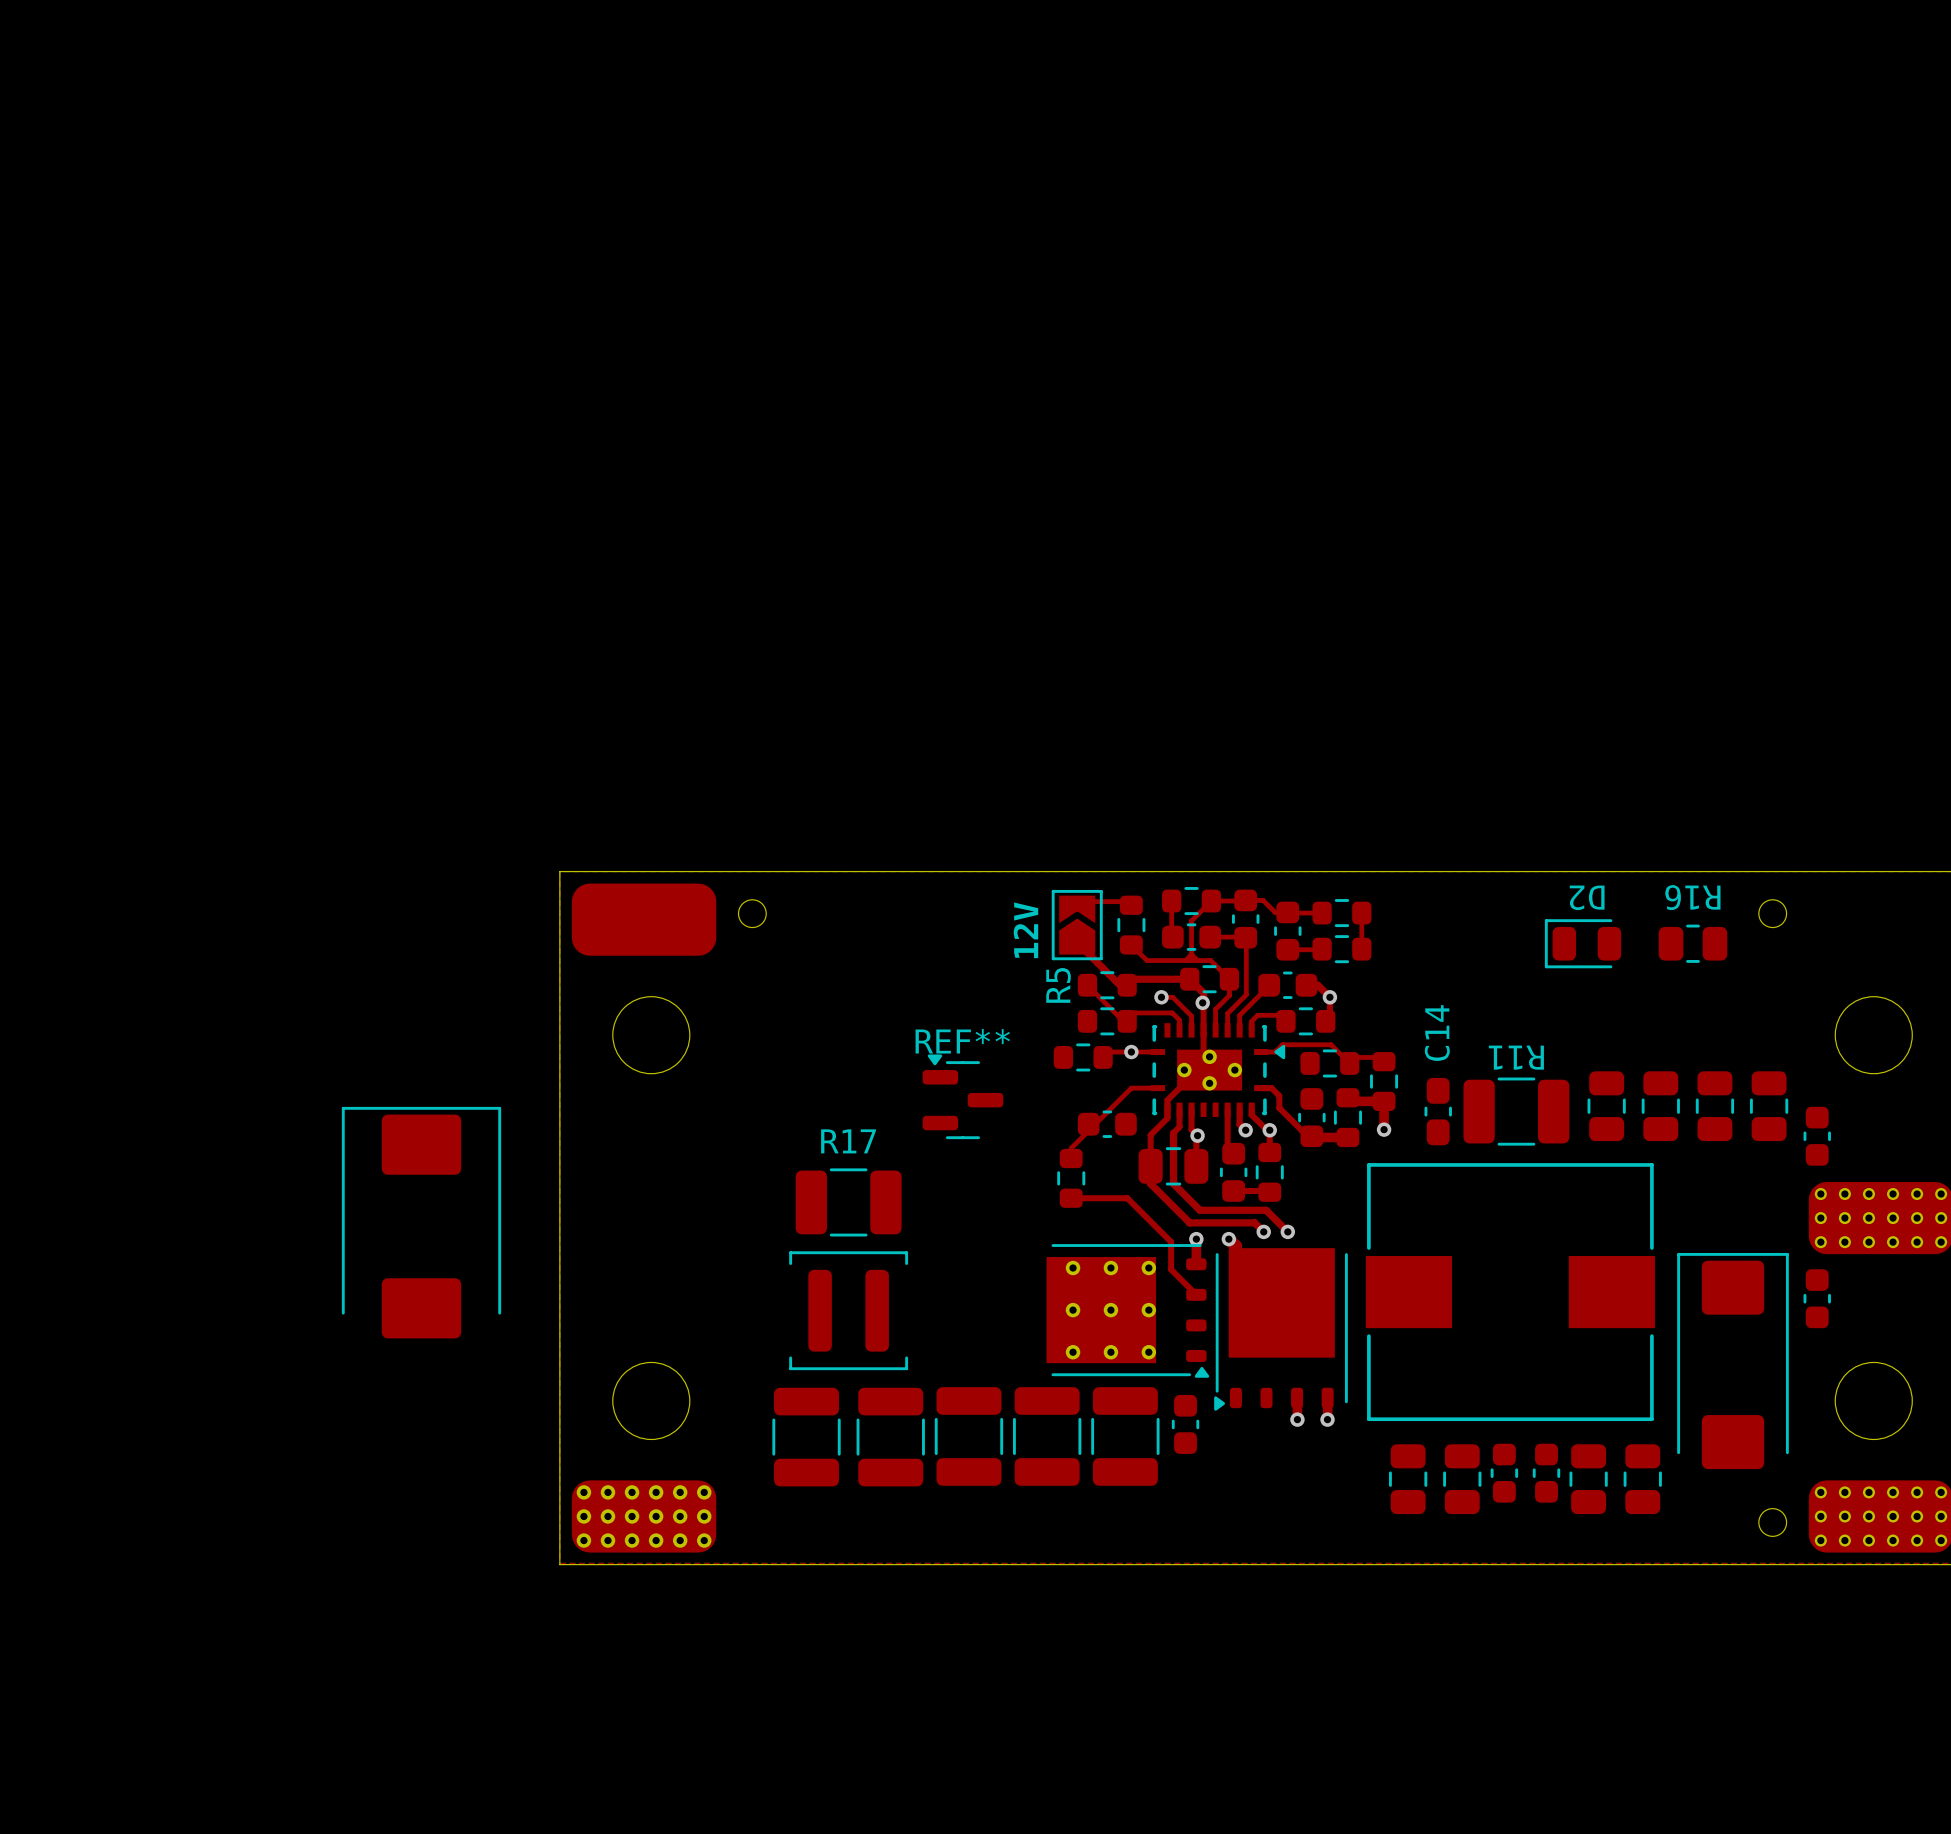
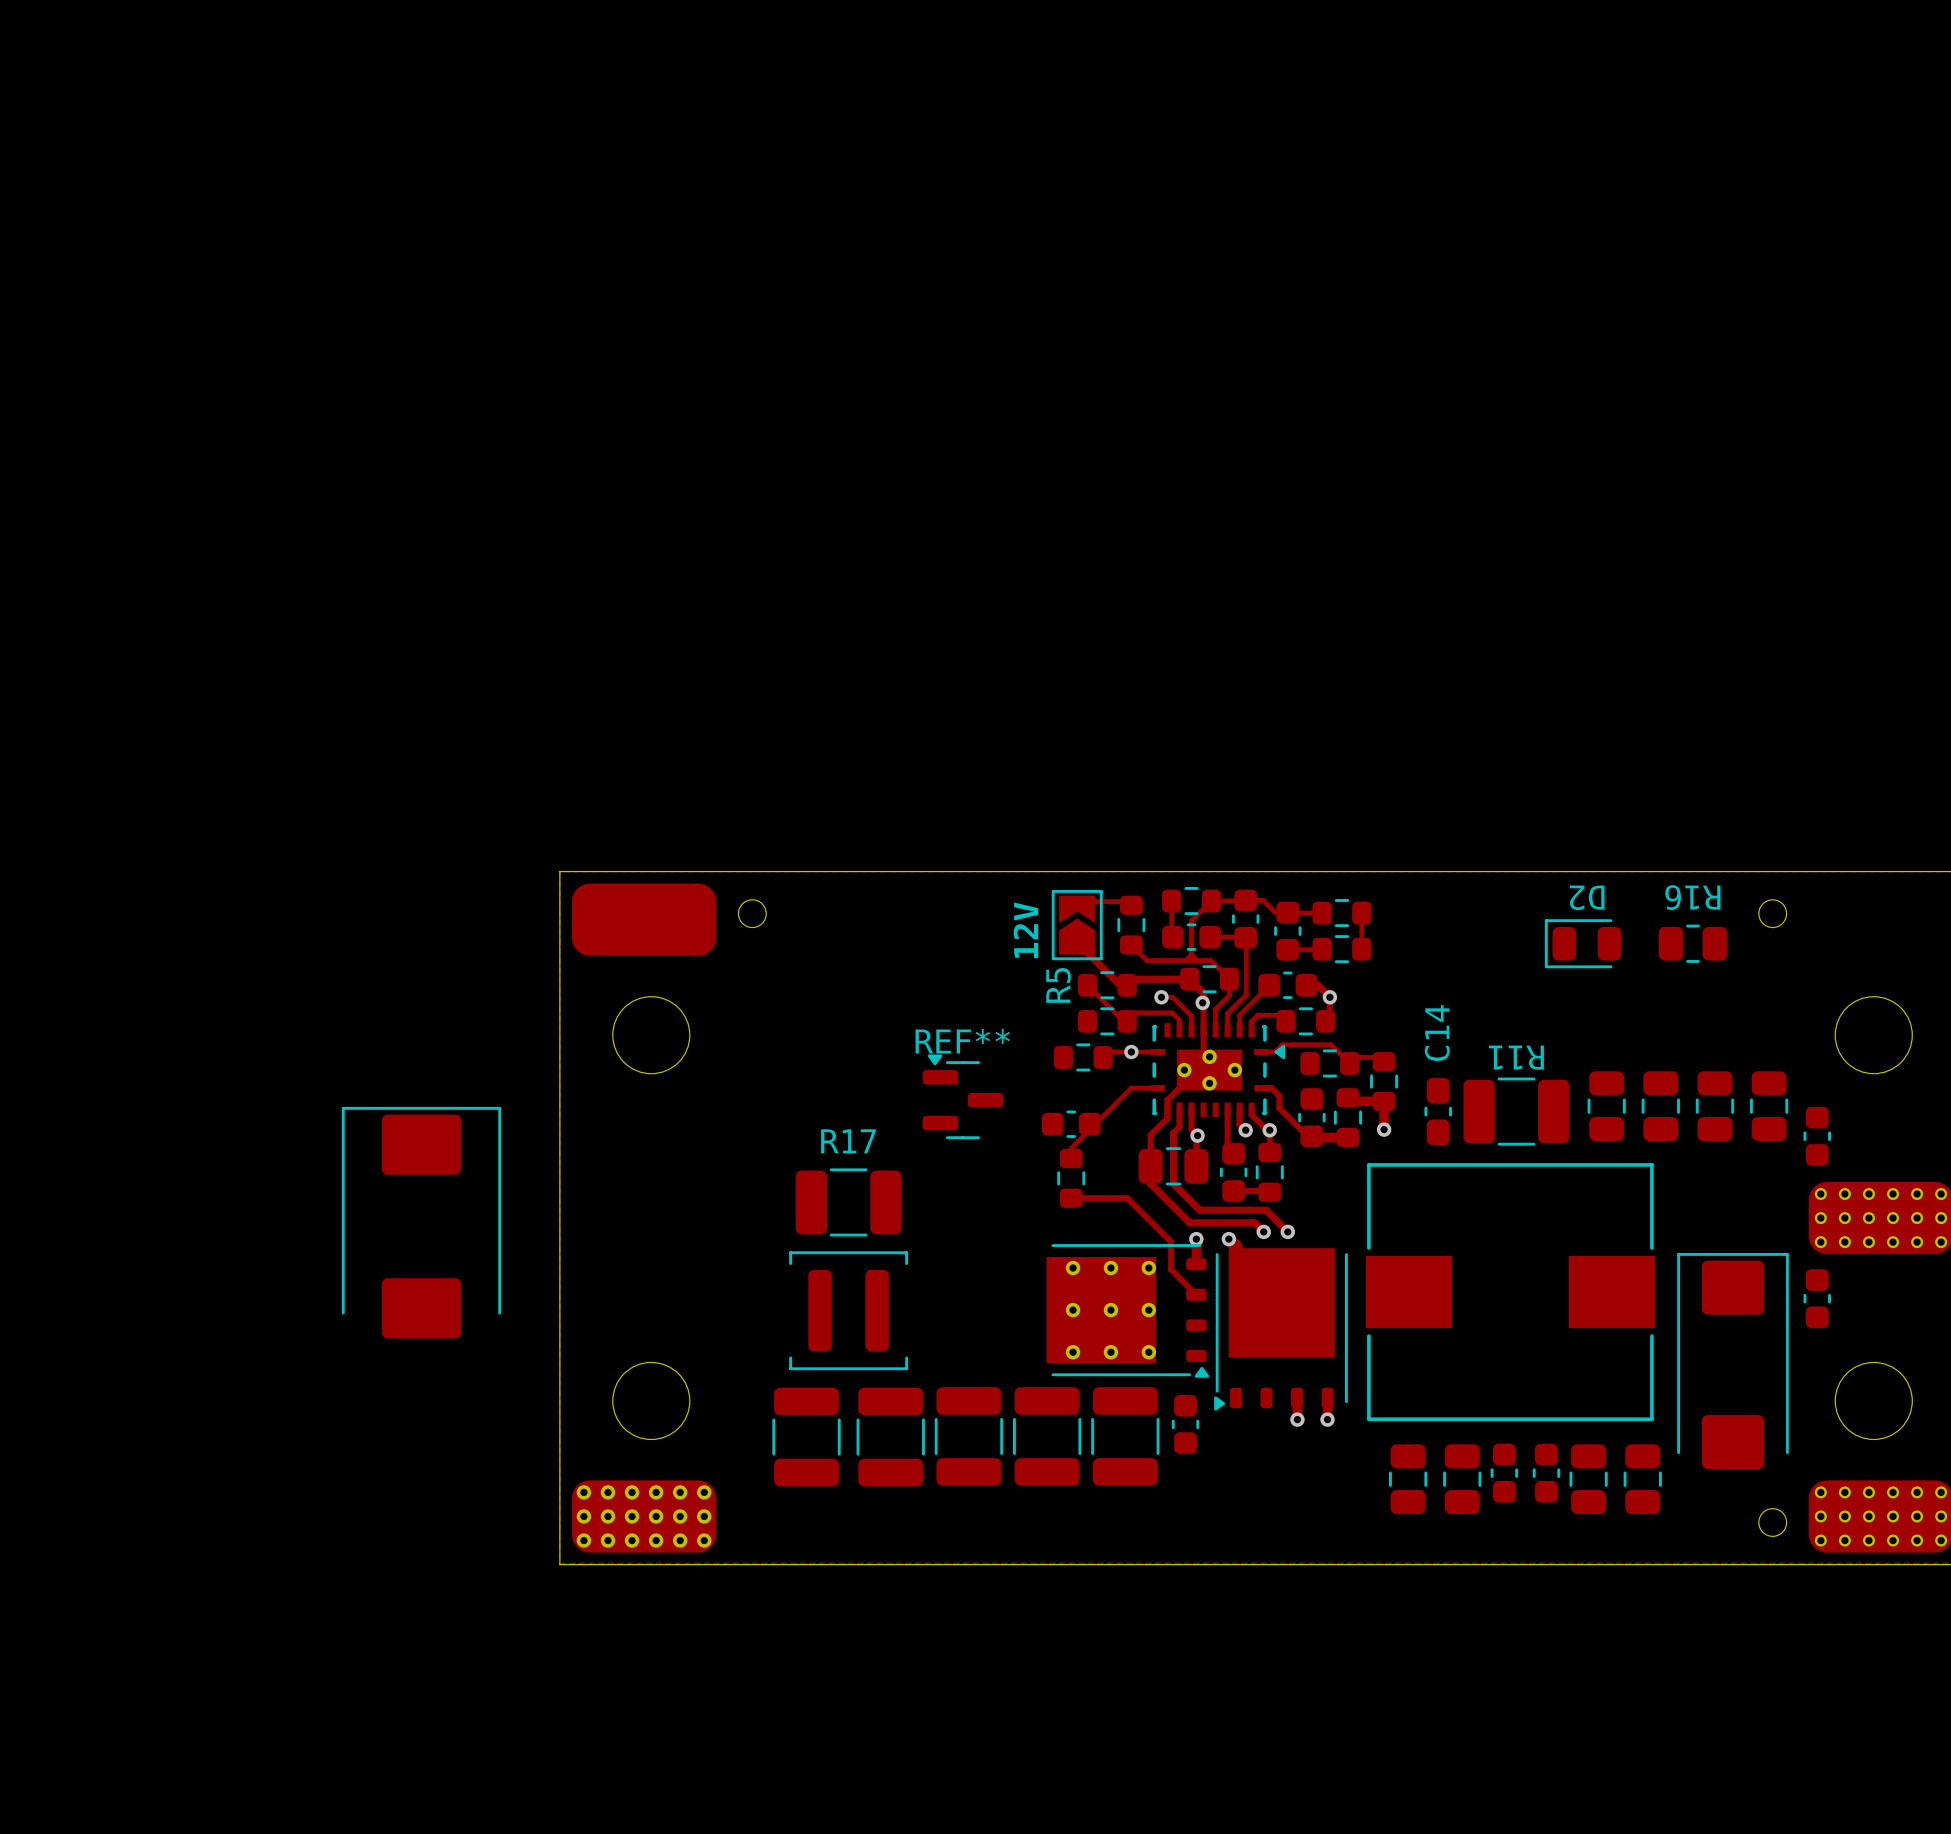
part position: (1107, 1124) -> (1071, 1124)

